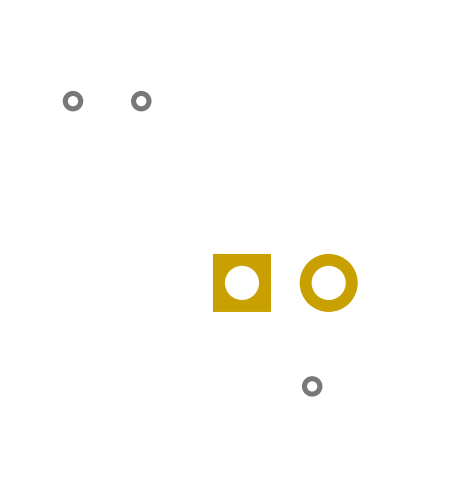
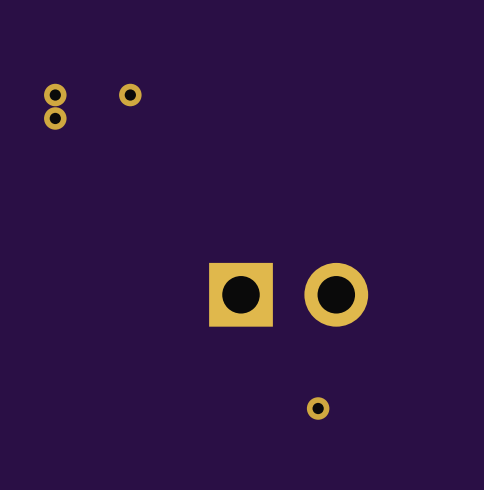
via: none -> (55, 118)

